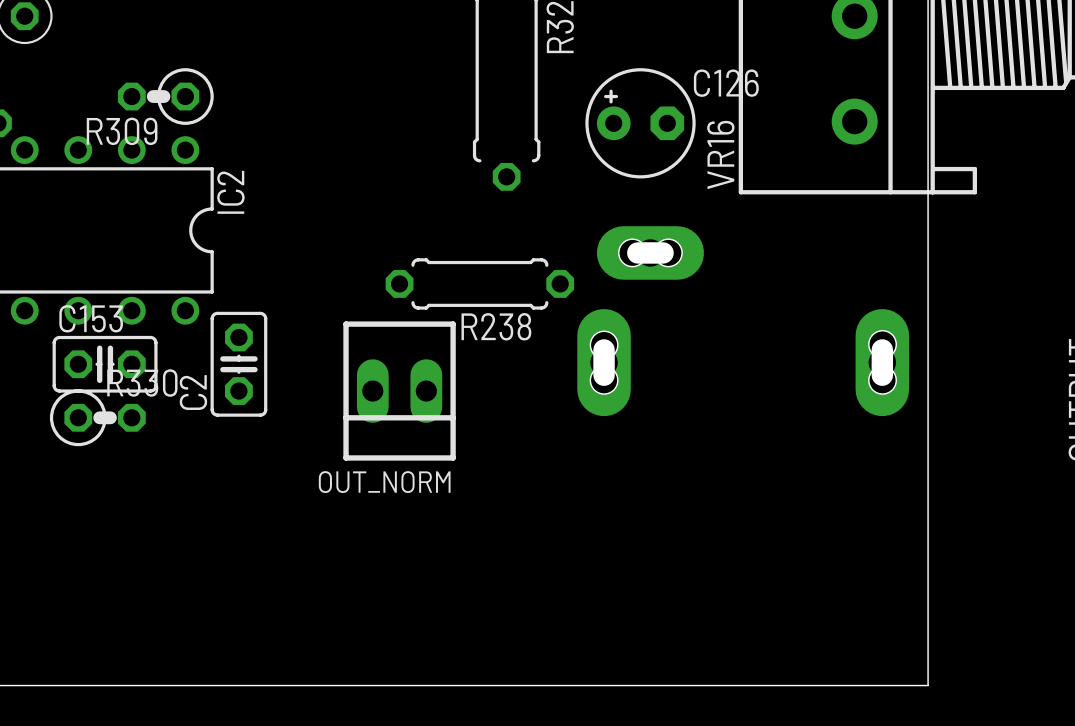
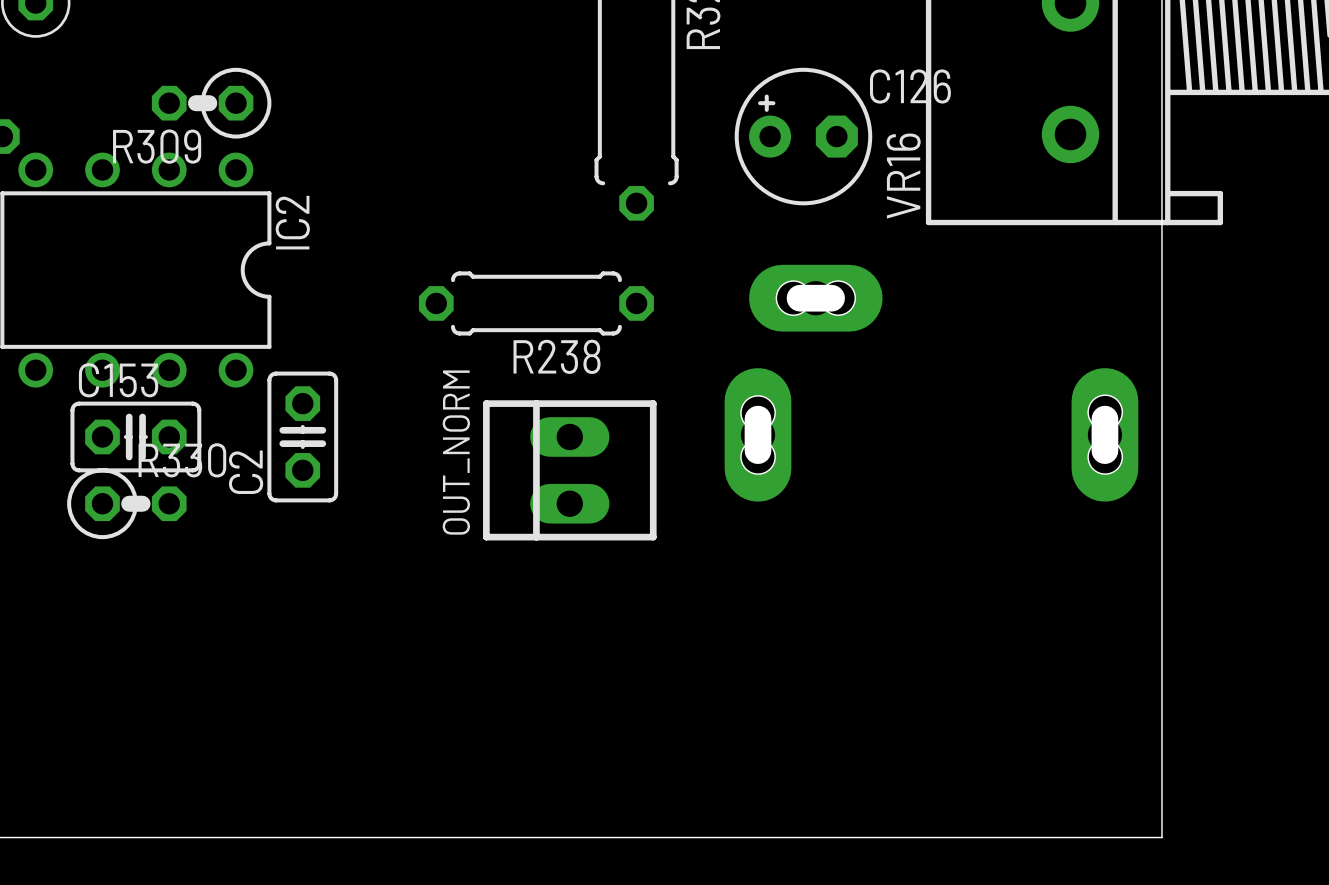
R238 position: (479, 283) -> (536, 303)
OUT_NORM rotation: 0° (399, 391) -> 90° clockwise (569, 470)

